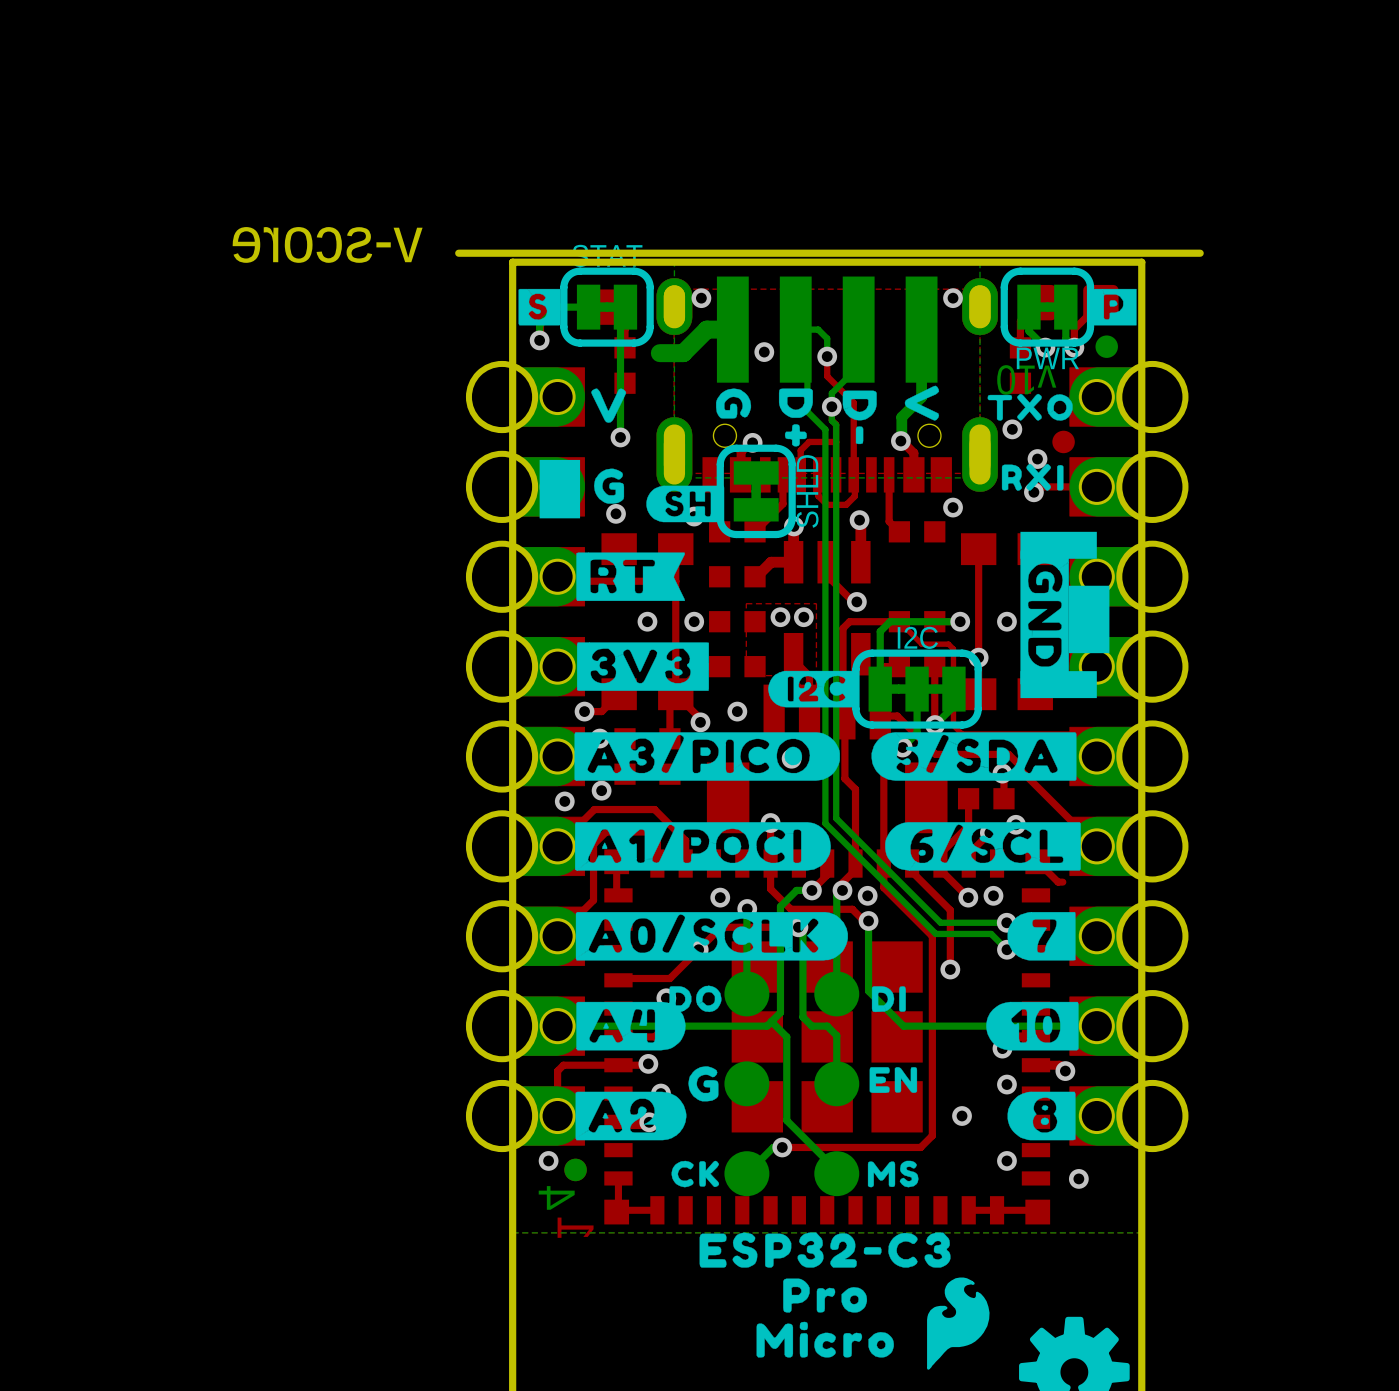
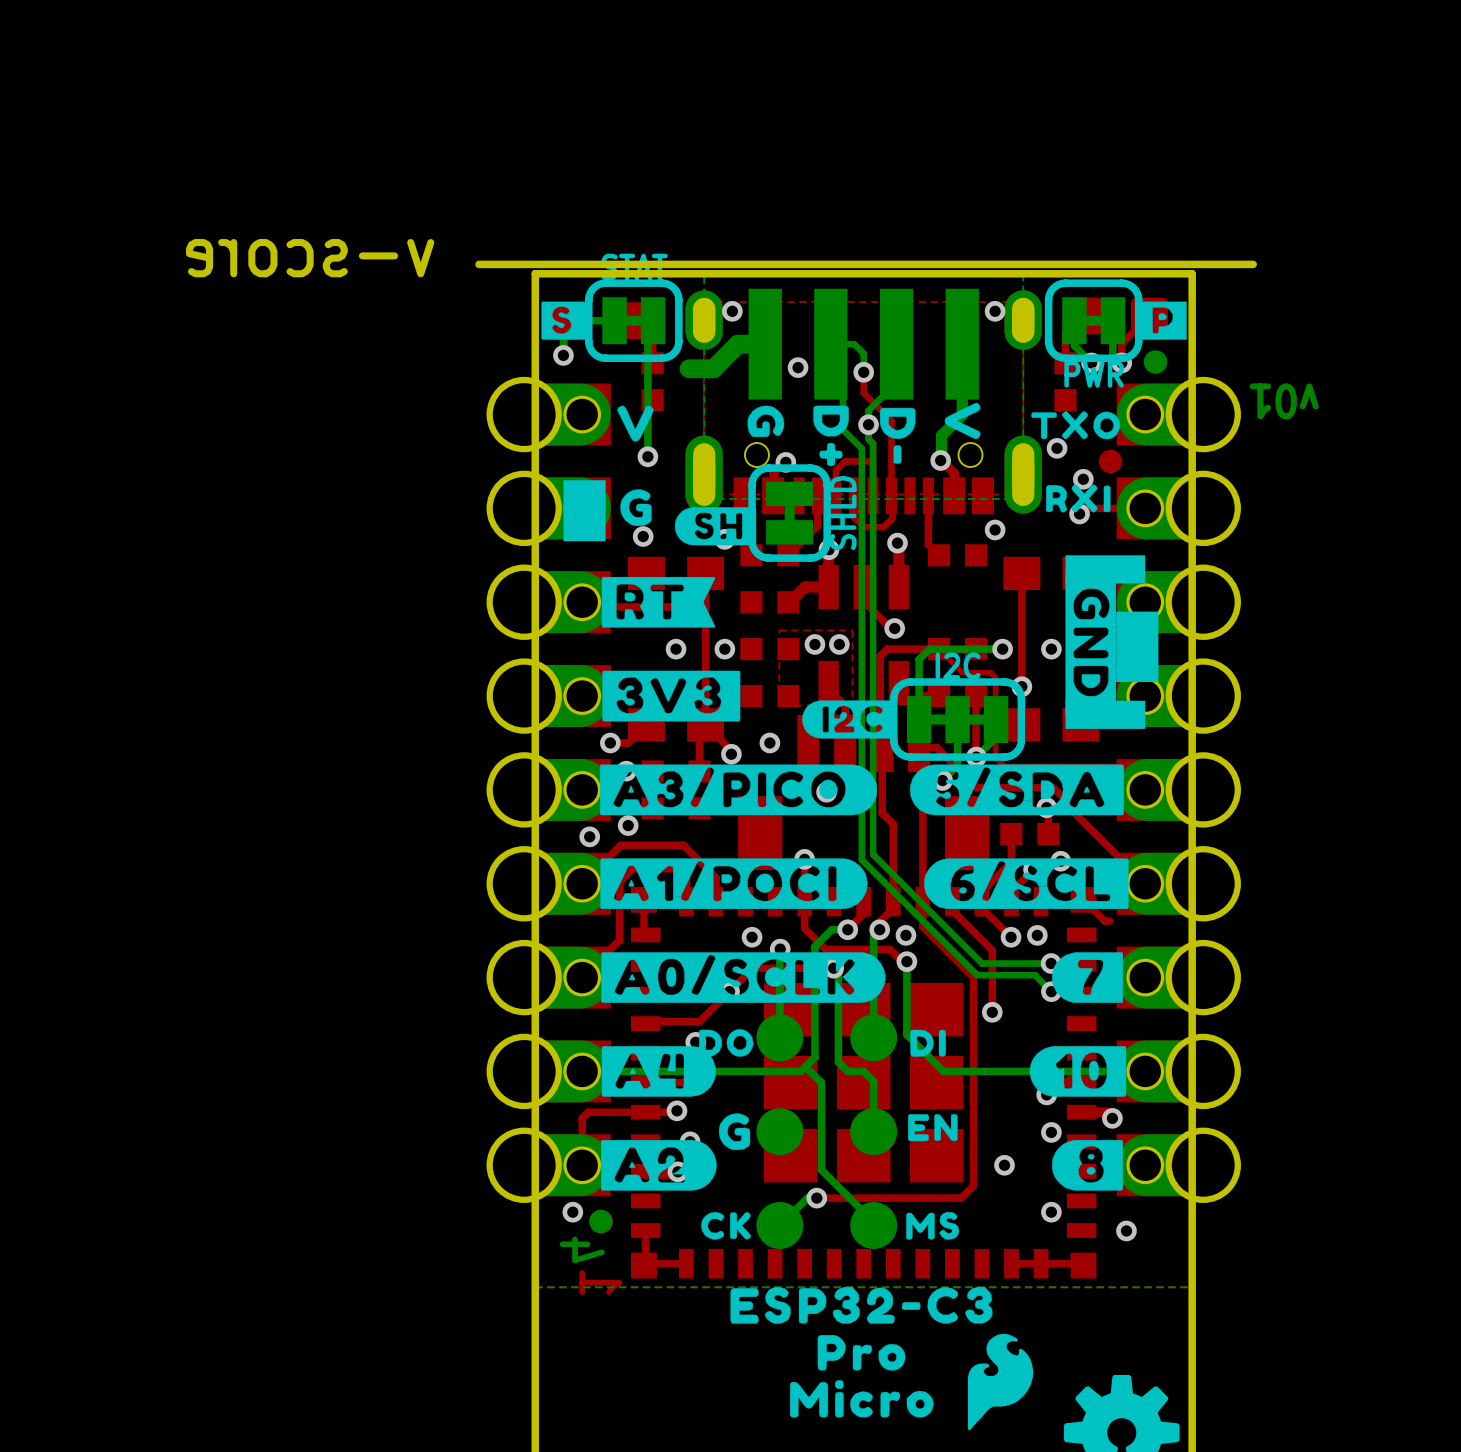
text: v10 (1026, 379) -> none
text: none -> v01 (1284, 401)

